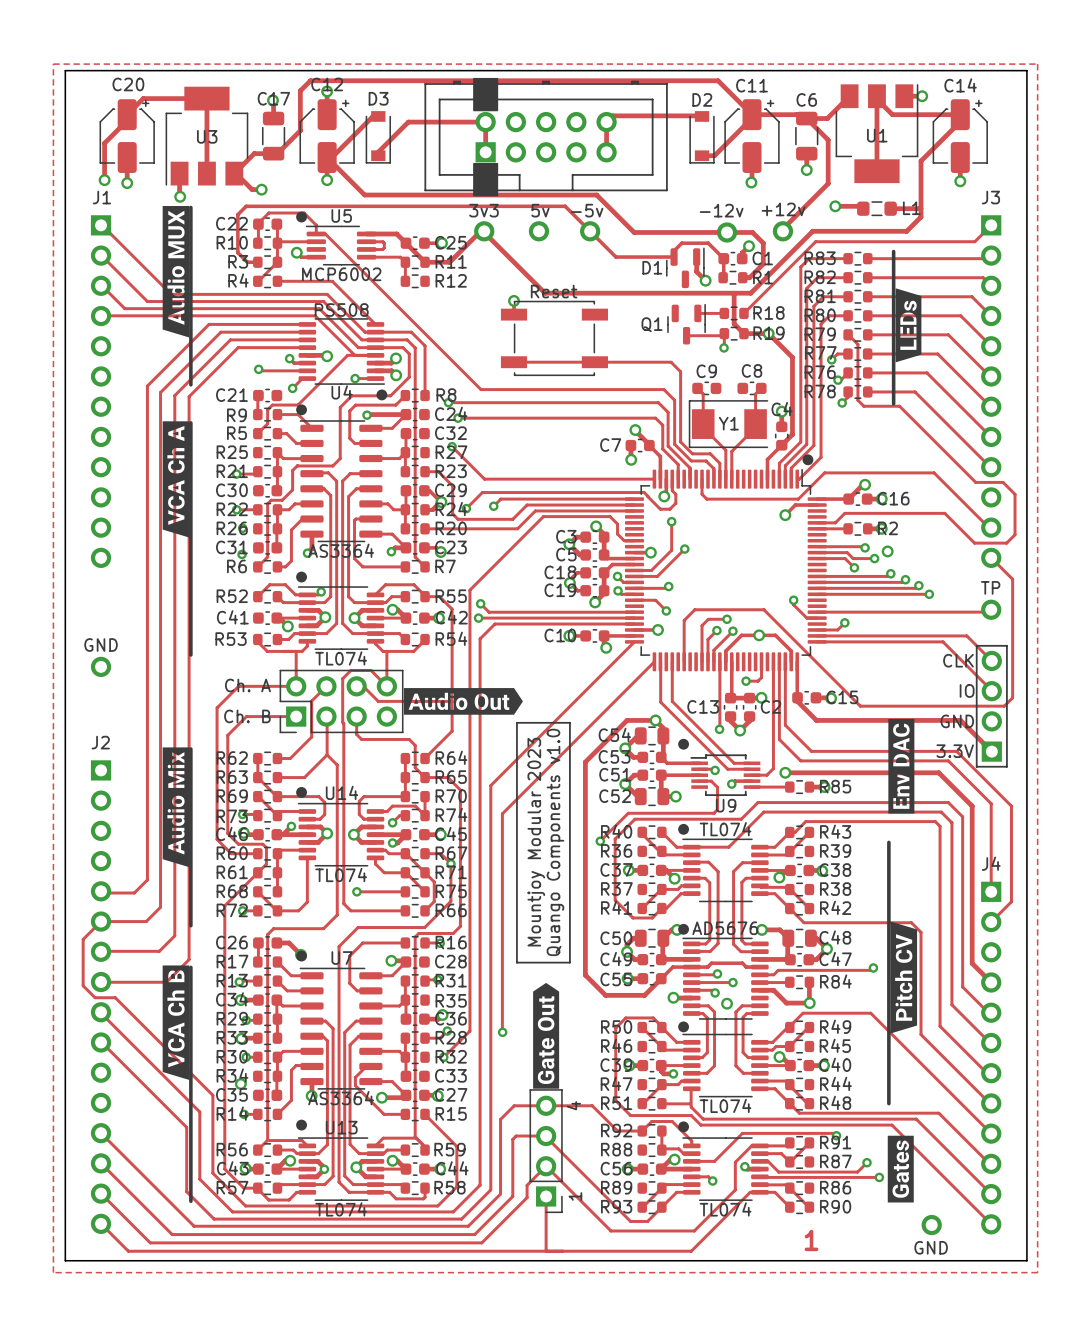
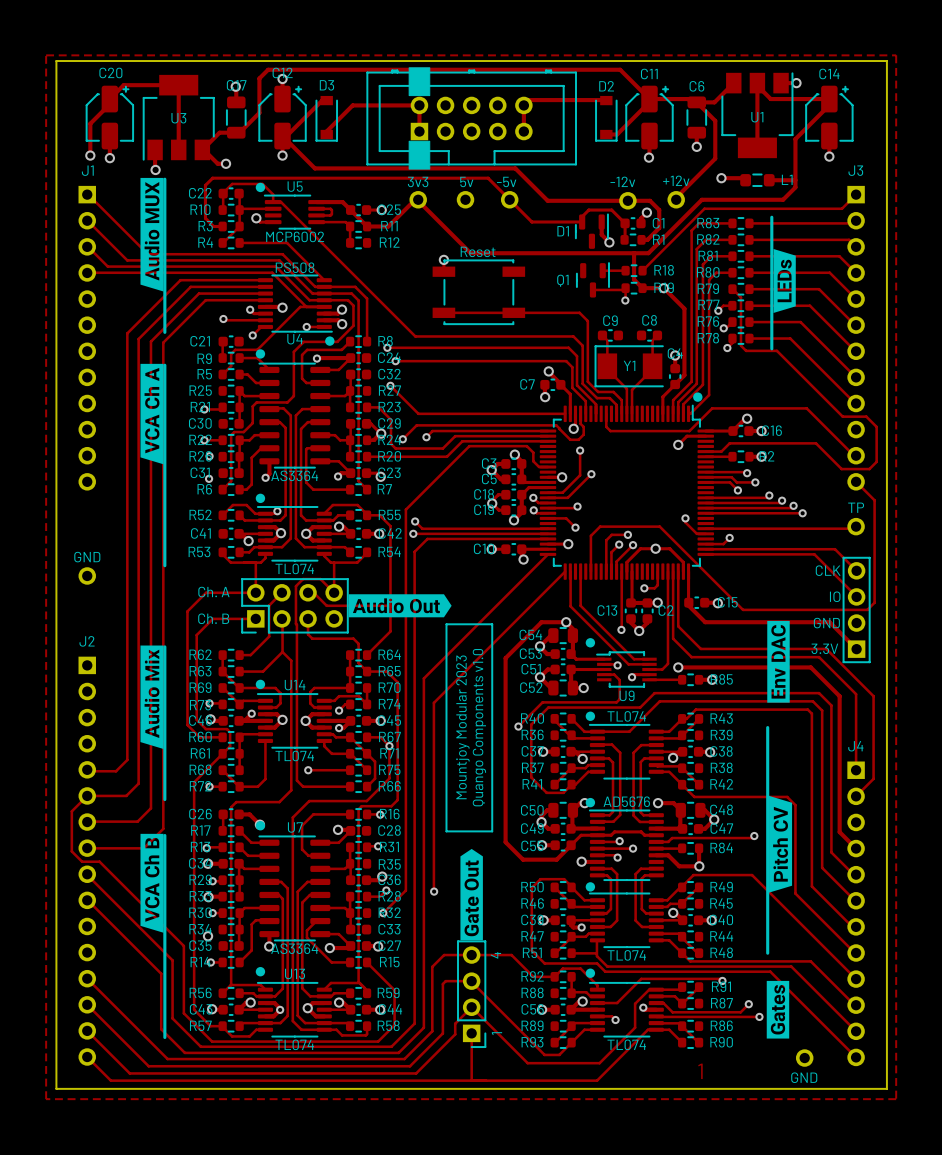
via: (887, 551) -> none
via: (727, 1003) -> none

